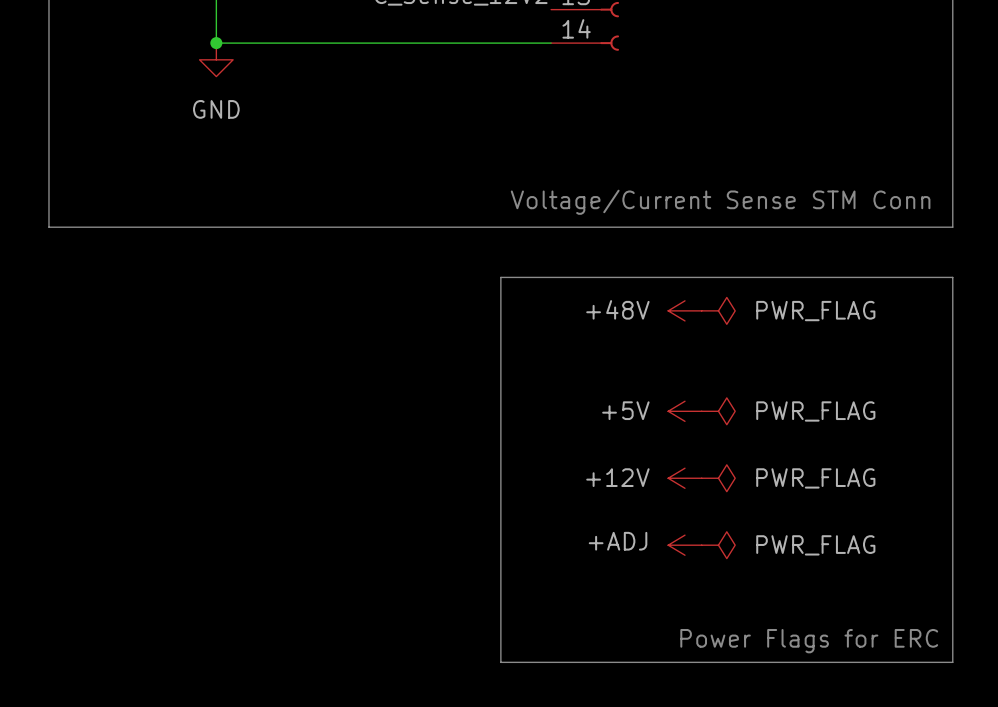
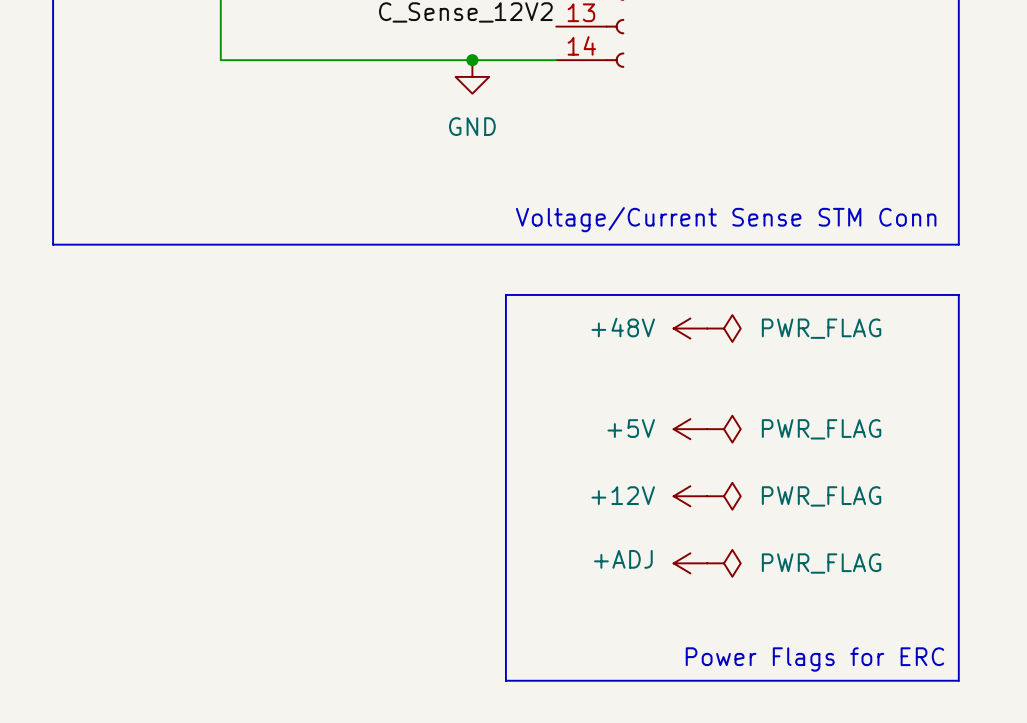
junction: (216, 43) -> none
junction: none -> (472, 60)
power symbol position: GND (216, 59) -> GND (472, 76)

